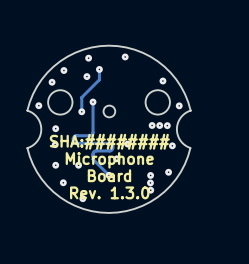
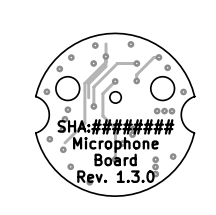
track: none -> (106, 43) (106, 62) (84, 83) (84, 123) (64, 142)
track: none -> (158, 57) (154, 57) (136, 74) (136, 80)
via: none -> (158, 57)
track: none -> (136, 63) (117, 63) (93, 87) (93, 106)
via: none -> (136, 63)
via: none -> (136, 80)
track: none -> (115, 81) (102, 93) (102, 115) (115, 128) (115, 156)
via: none -> (115, 81)
track: (93, 102) (92, 134) (75, 135) (73, 141) (75, 143) (111, 144) (111, 150) (95, 150) (93, 153) (93, 159) (108, 175) -> none
via: (93, 102) -> none
via: (81, 111) -> none
via: none -> (93, 106)
via: none -> (67, 109)
via: (55, 128) -> none
via: none -> (64, 119)
via: (172, 145) -> none
via: none -> (132, 134)
via: none -> (49, 139)
via: (78, 165) -> none

